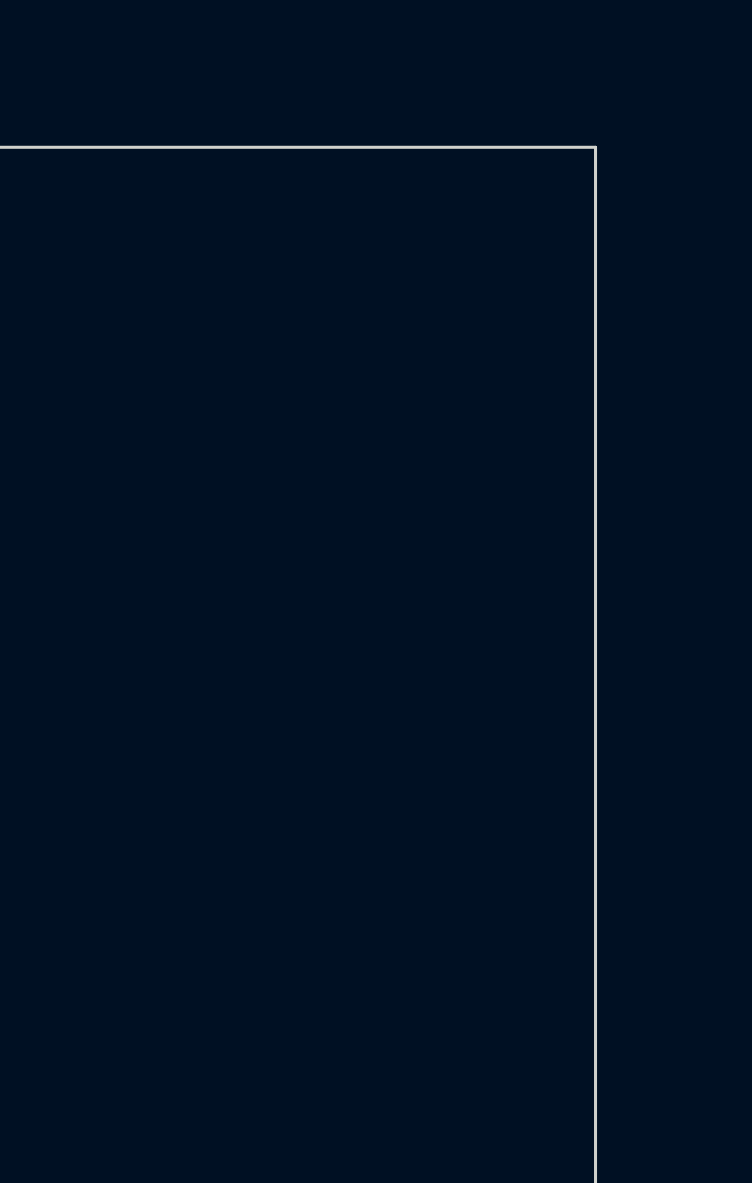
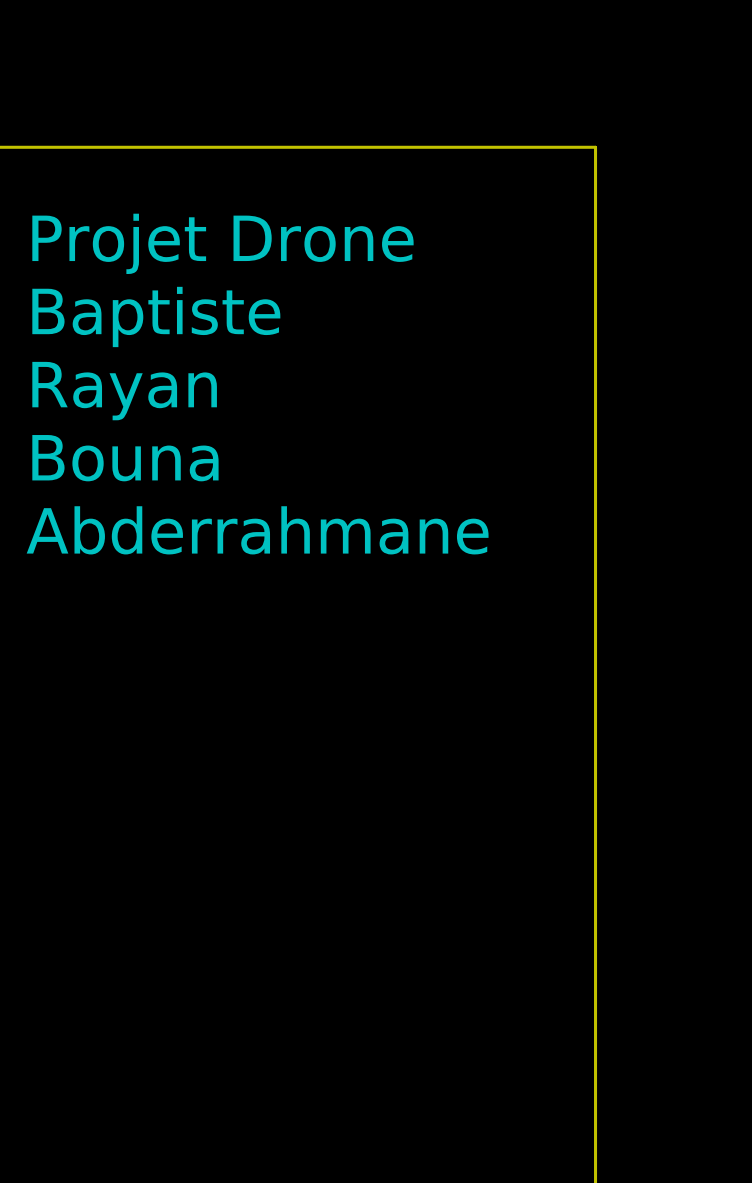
text: none -> Projet Drone (222, 243)
text: none -> Baptiste (156, 316)
text: none -> Rayan (124, 391)
text: none -> Bouna (125, 458)
text: none -> Abderrahmane (257, 530)

